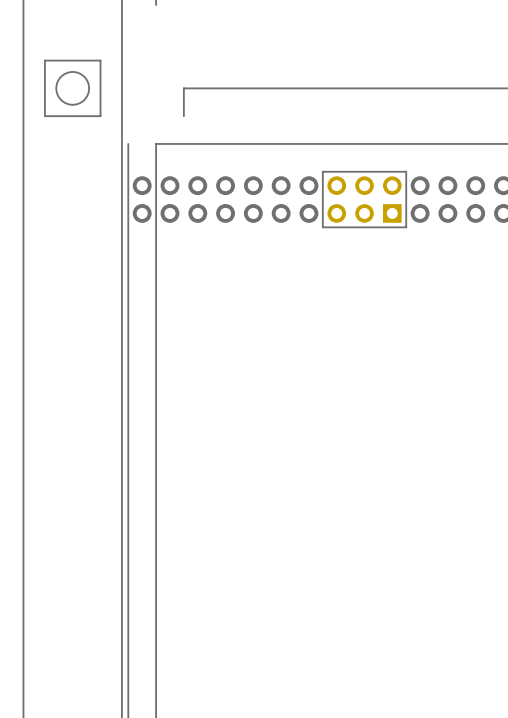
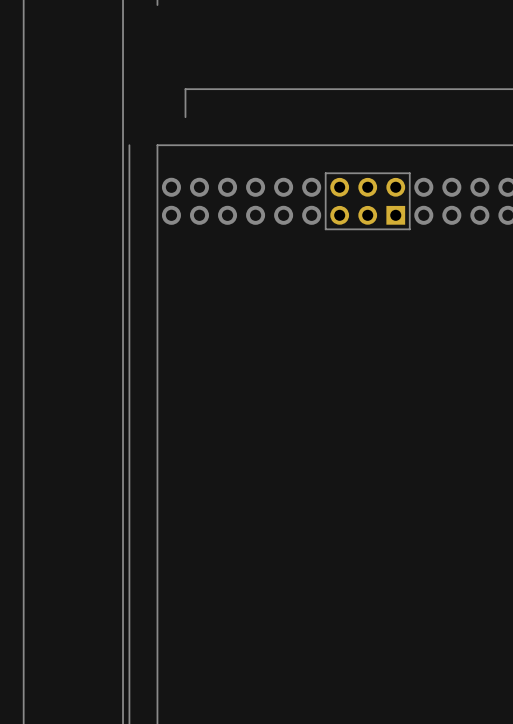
line: (44, 60) (44, 116) (100, 116) (100, 60) (44, 60) -> none
drawing: [55, 71, 90, 106] -> none
drawing: [132, 176, 152, 223] -> none

